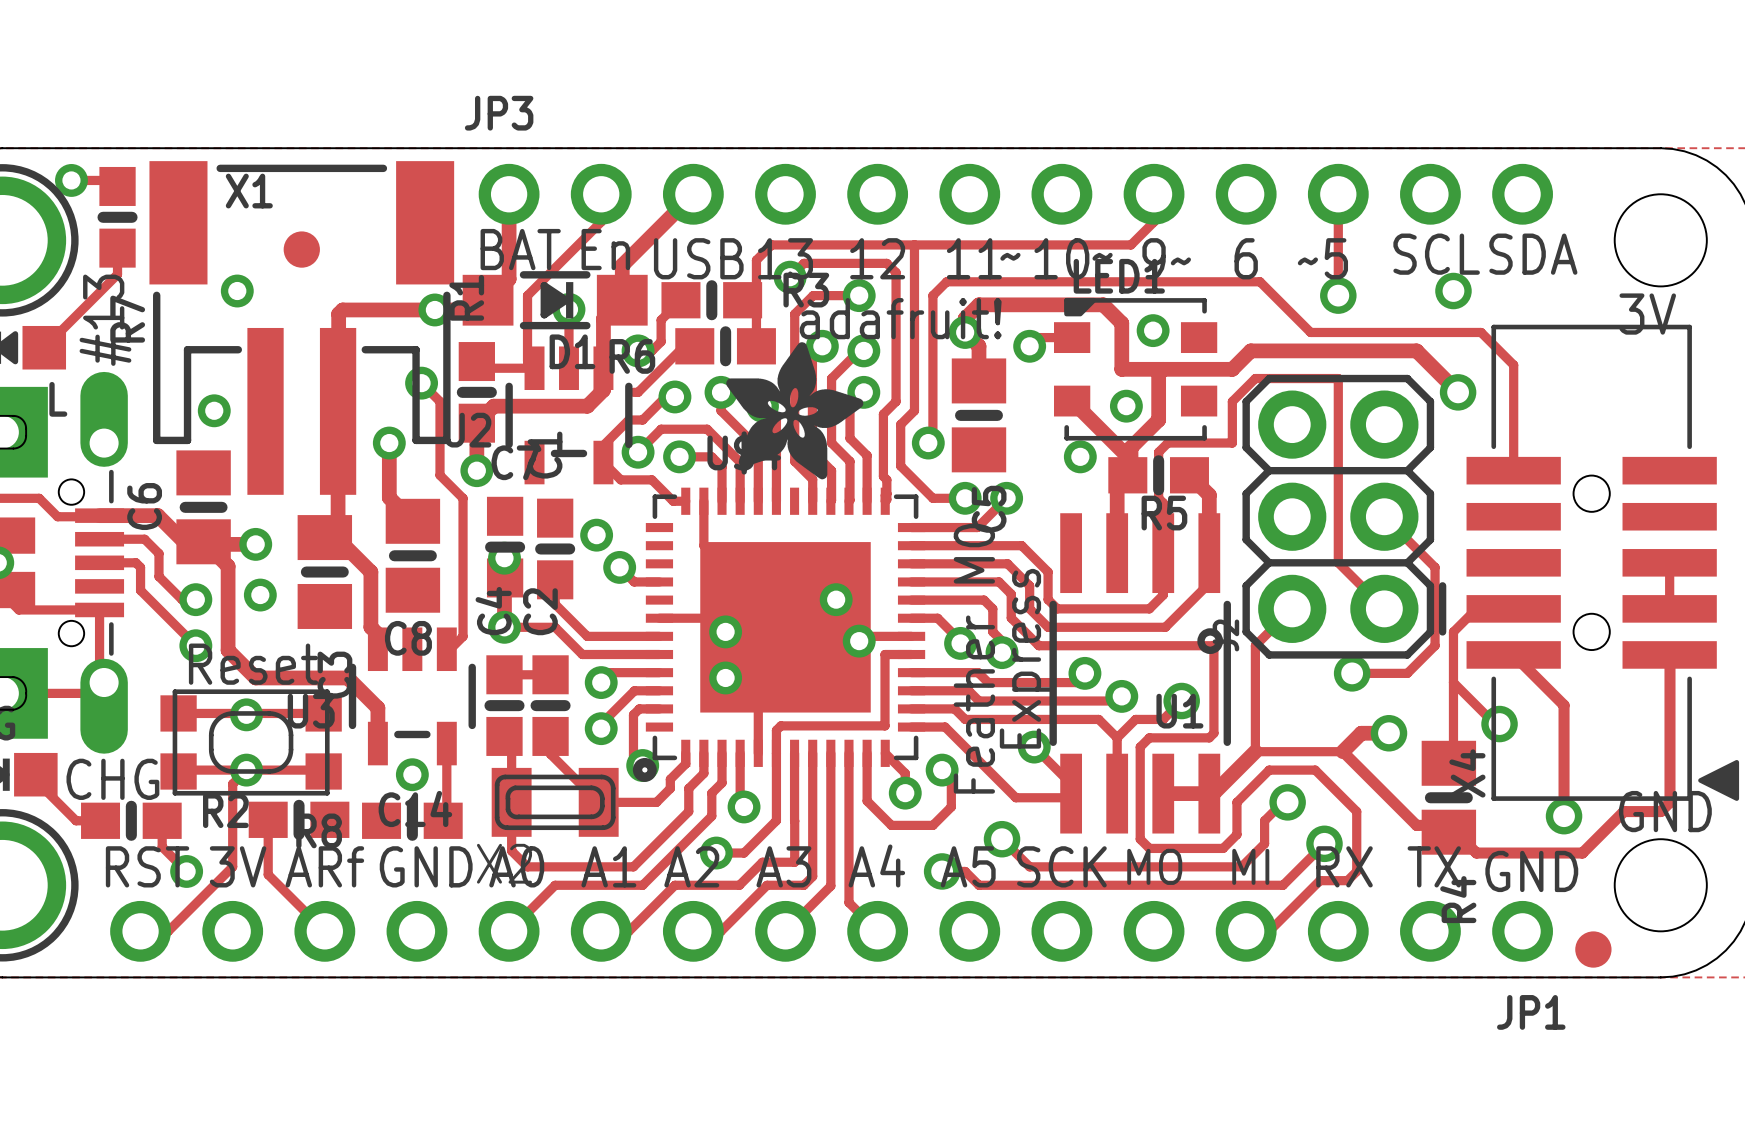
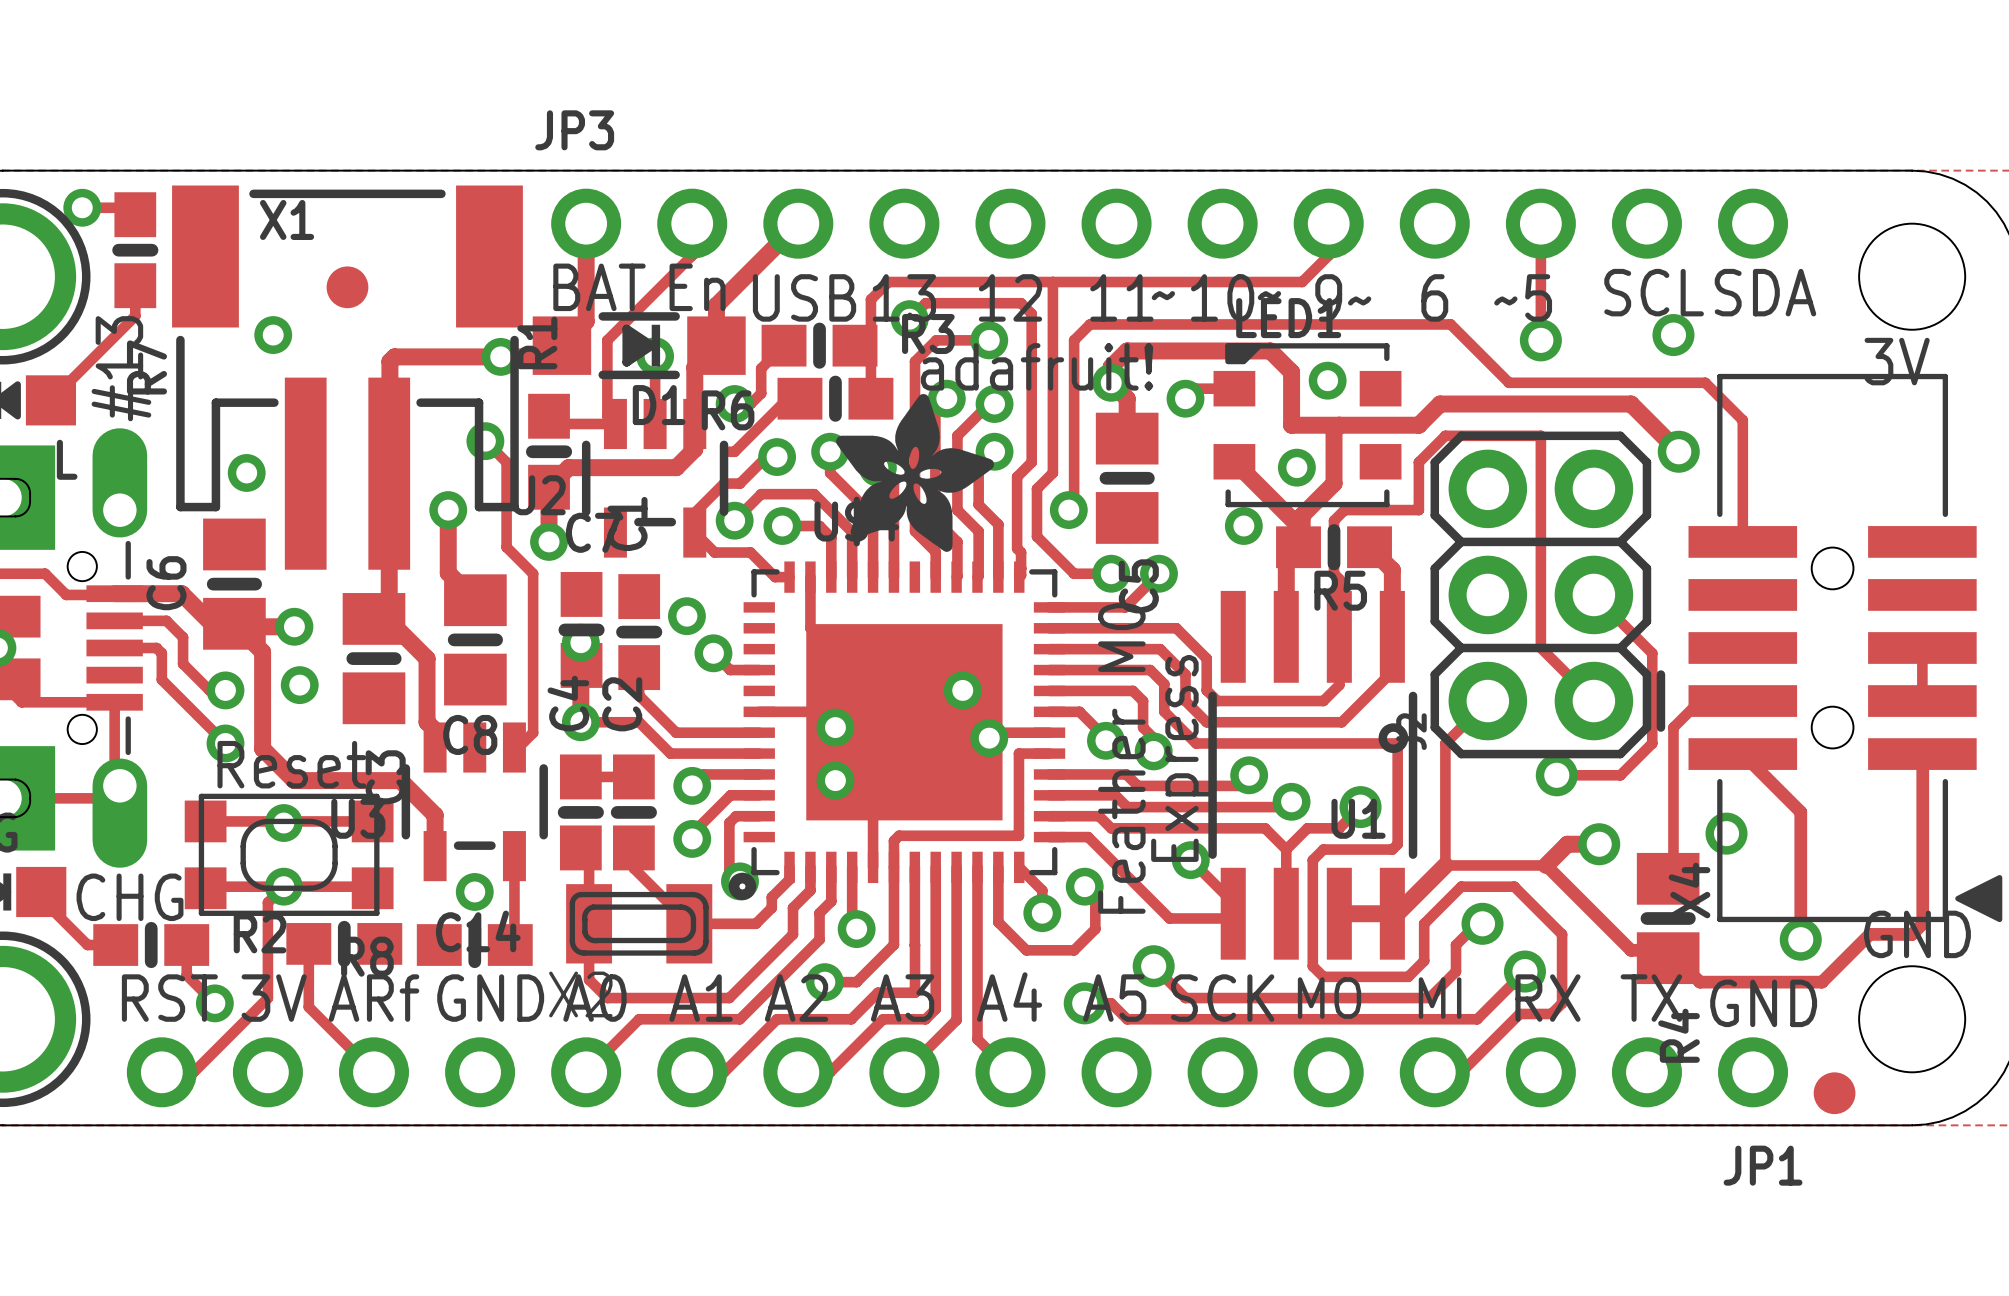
track: (1453, 682) (1494, 724) (1499, 724) -> none

